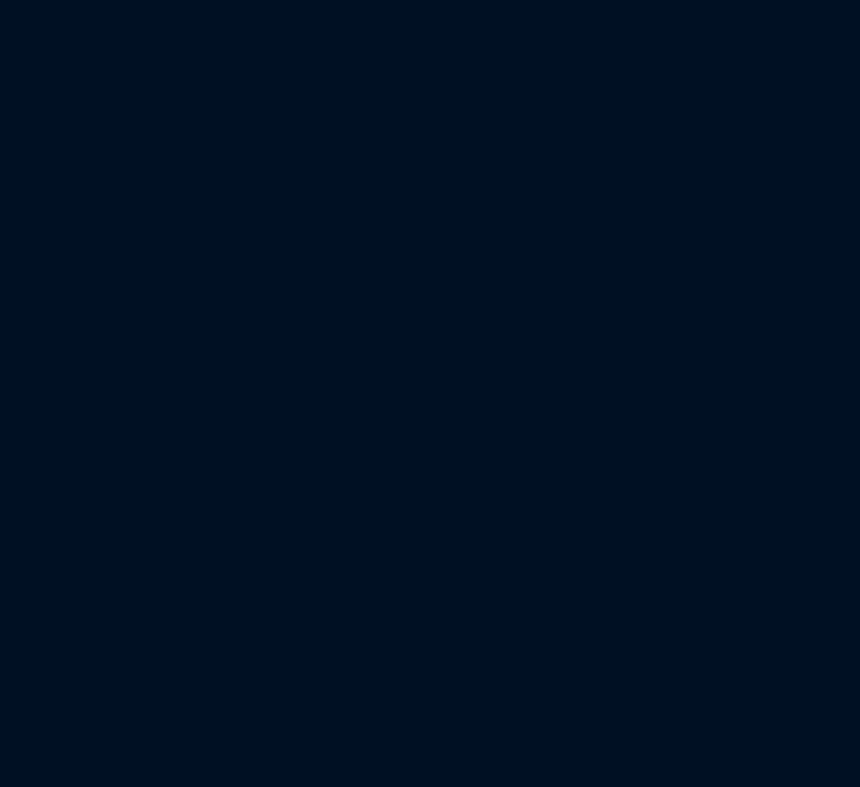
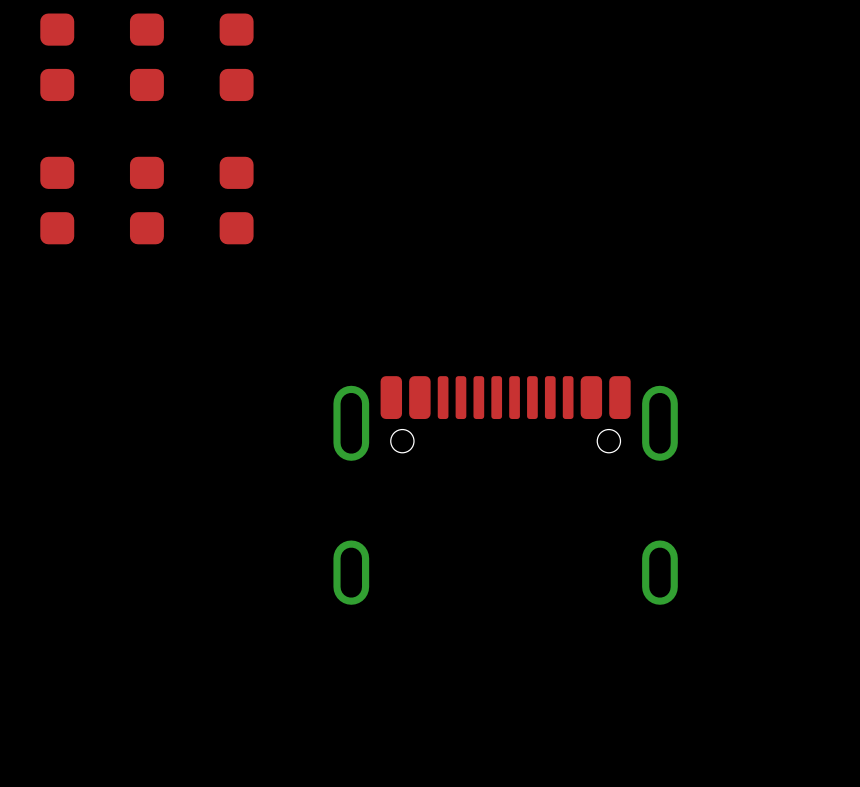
part: none -> (57, 57)
part: none -> (146, 57)
part: none -> (236, 57)
part: none -> (57, 200)
part: none -> (146, 200)
part: none -> (236, 200)
part: none -> (505, 490)

